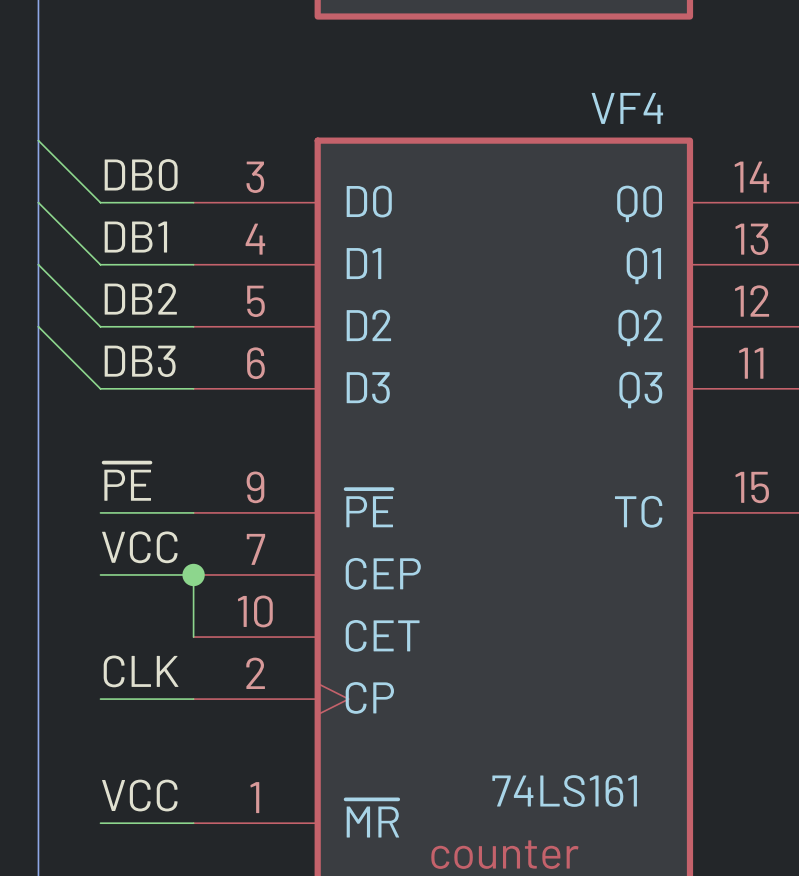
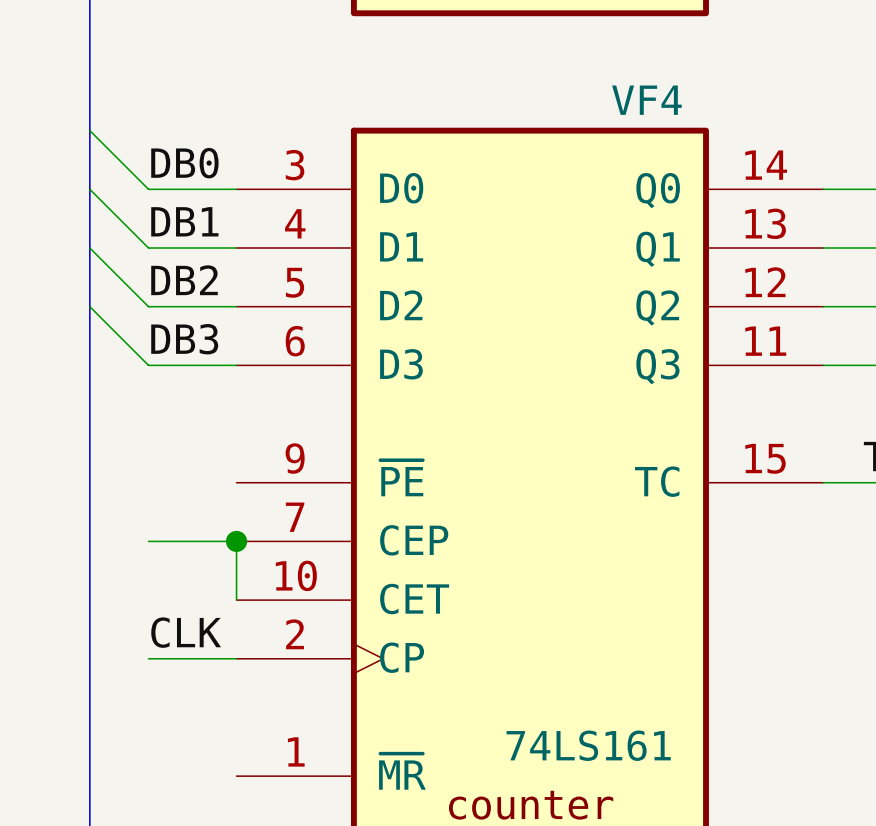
label: ~{PE} (127, 481) -> none
wire: (100, 512) (193, 512) -> none
label: VCC (139, 547) -> none
label: VCC (139, 795) -> none
wire: (100, 823) (193, 823) -> none

